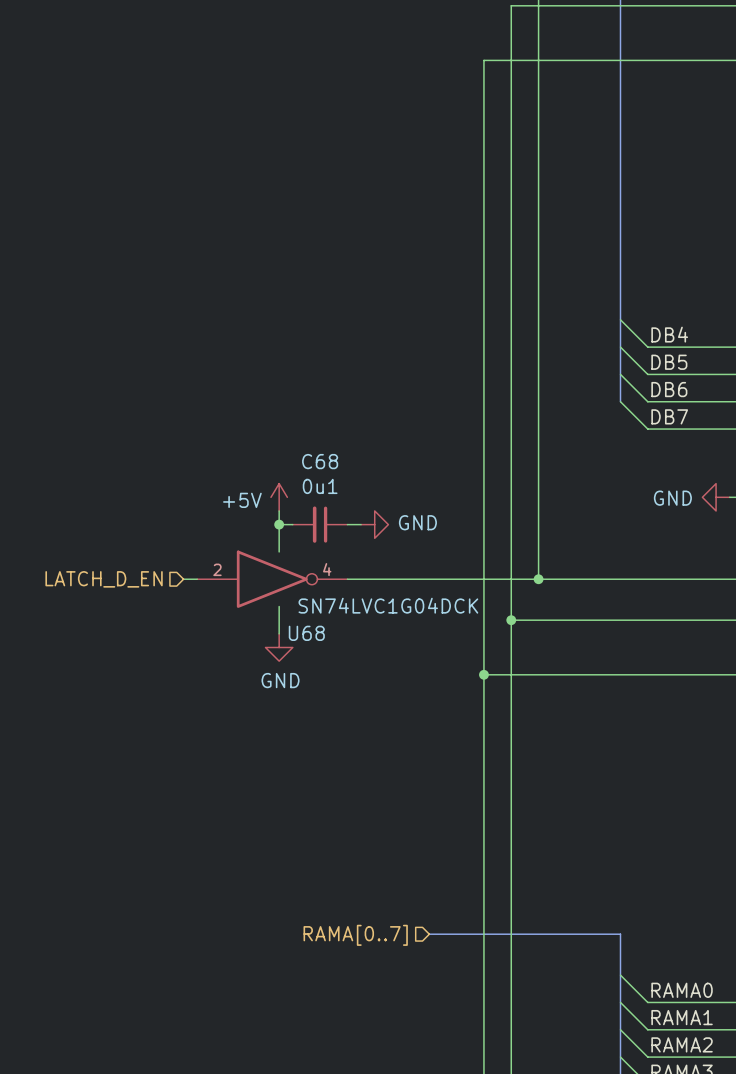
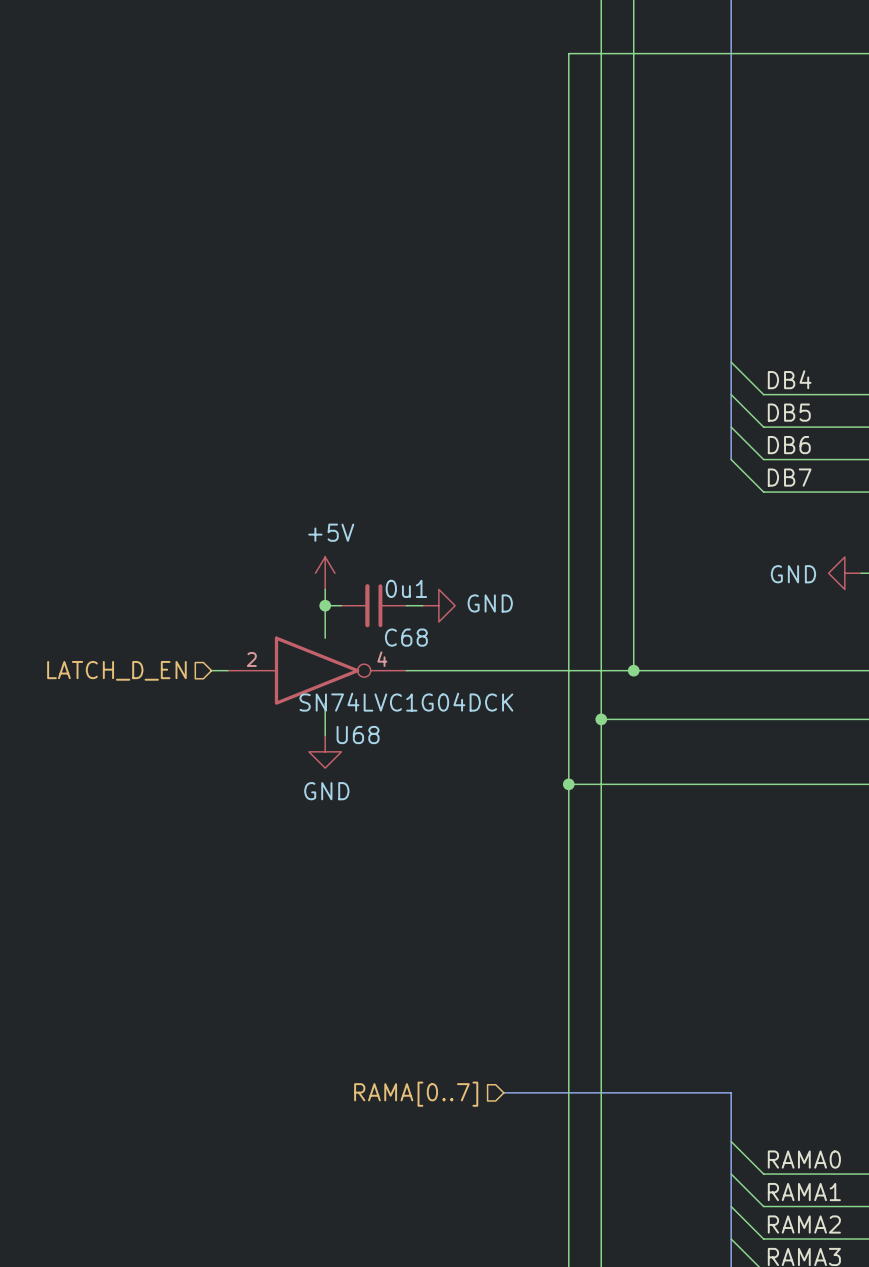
C68 name position: C68 (320, 461) -> C68 (406, 637)
C68 value position: 0u1 (320, 486) -> 0u1 (406, 588)
power symbol text position: +5V (242, 500) -> +5V (331, 532)
U68 value position: SN74LVC1G04DCK (388, 605) -> SN74LVC1G04DCK (406, 702)

